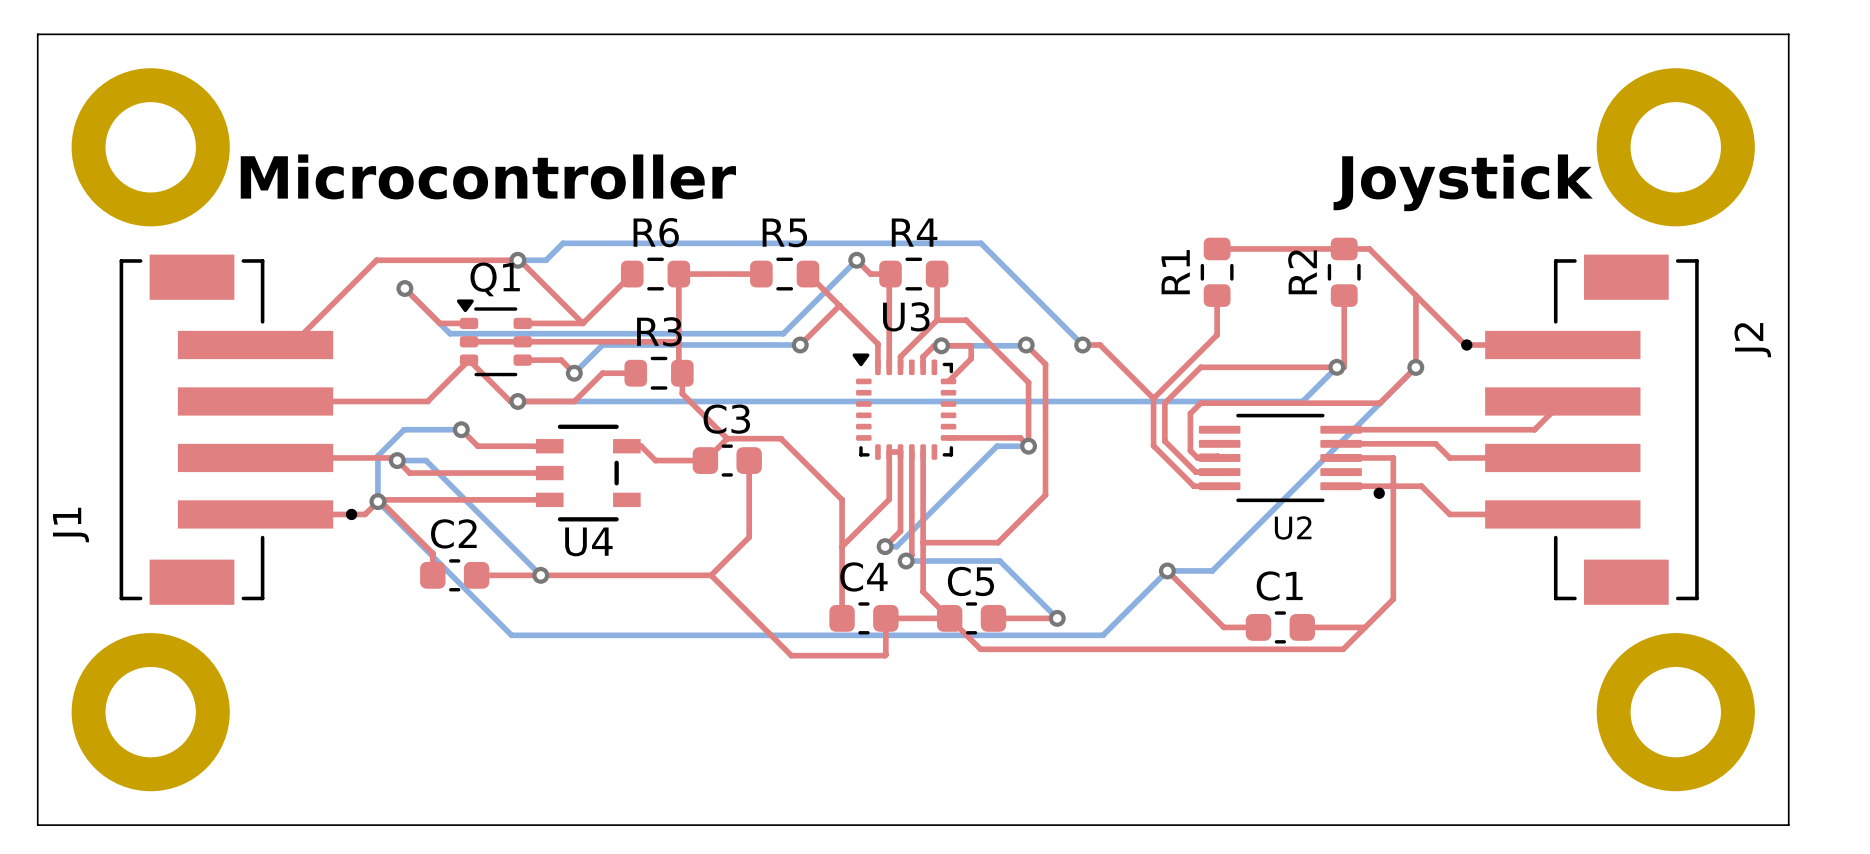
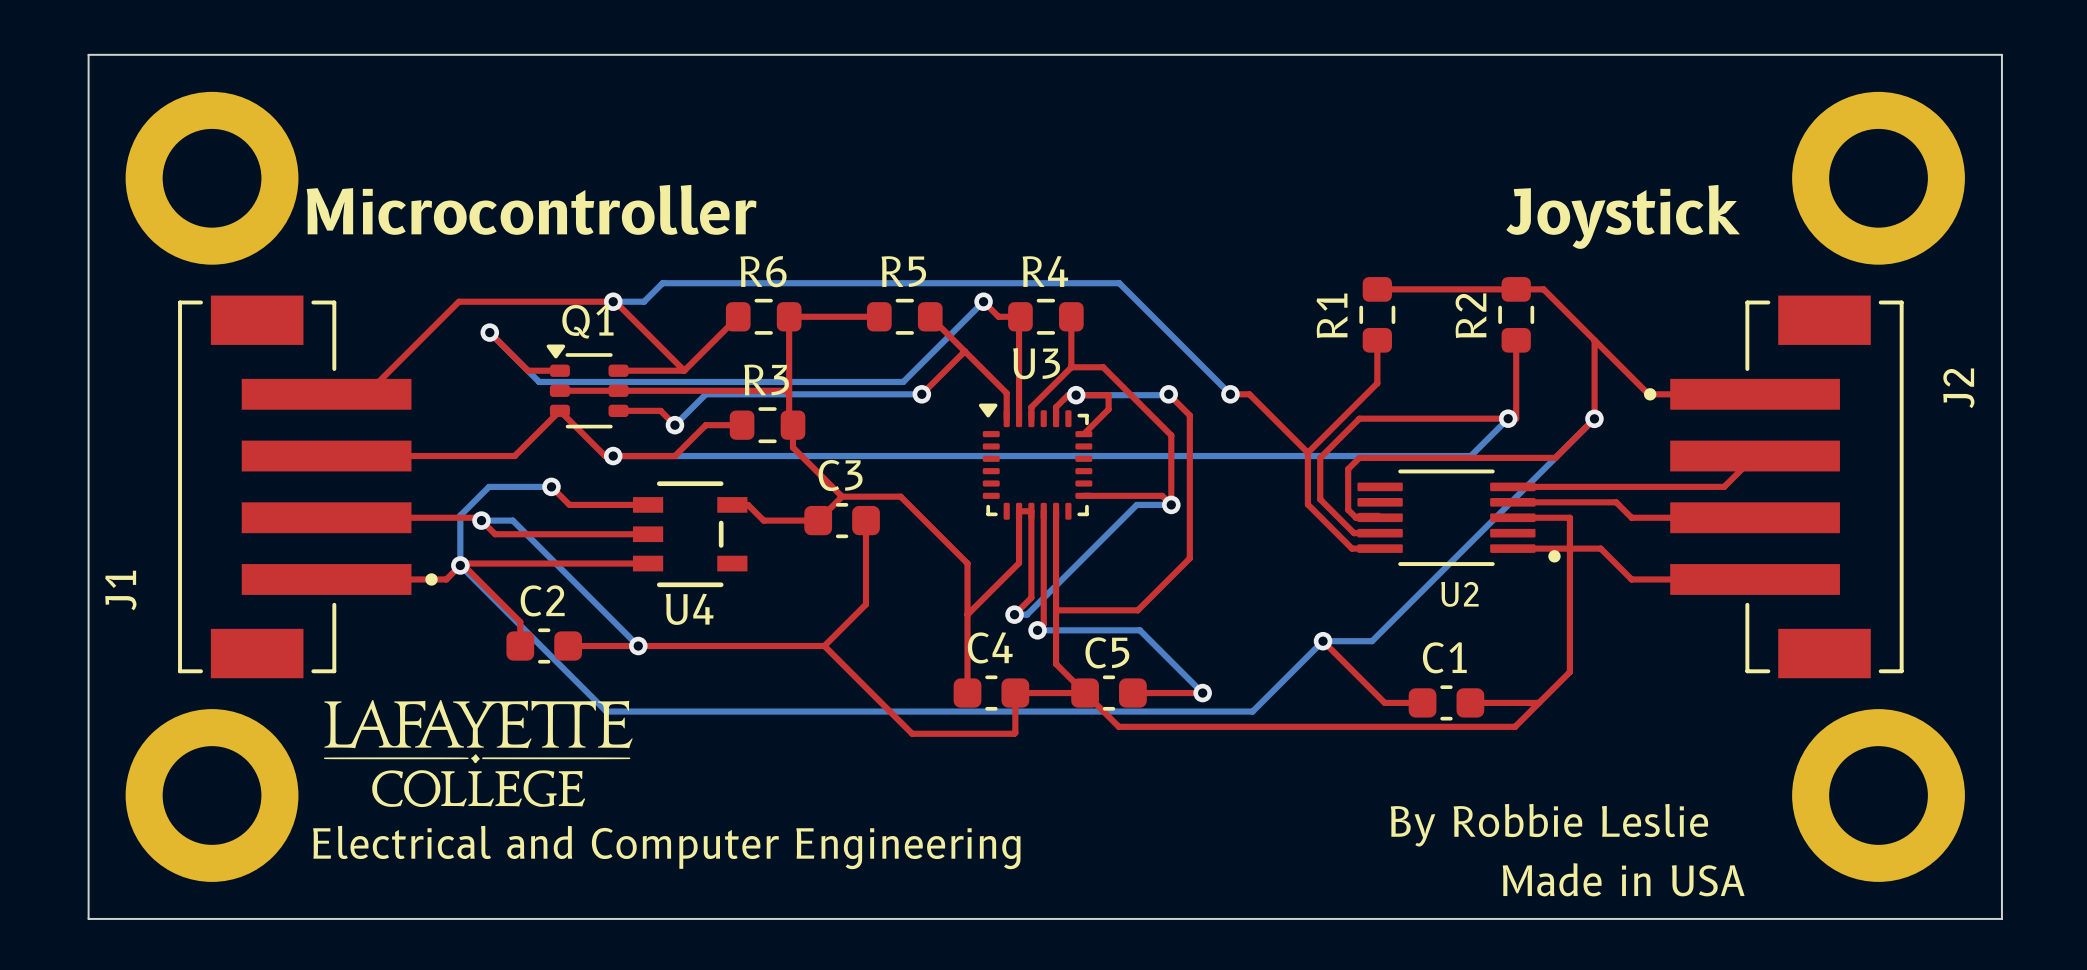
drawing: none -> [324, 699, 633, 808]
text: none -> By Robbie Leslie (1549, 825)
text: none -> Electrical and Computer Engineering (666, 847)
text: none -> Made in USA (1623, 879)

